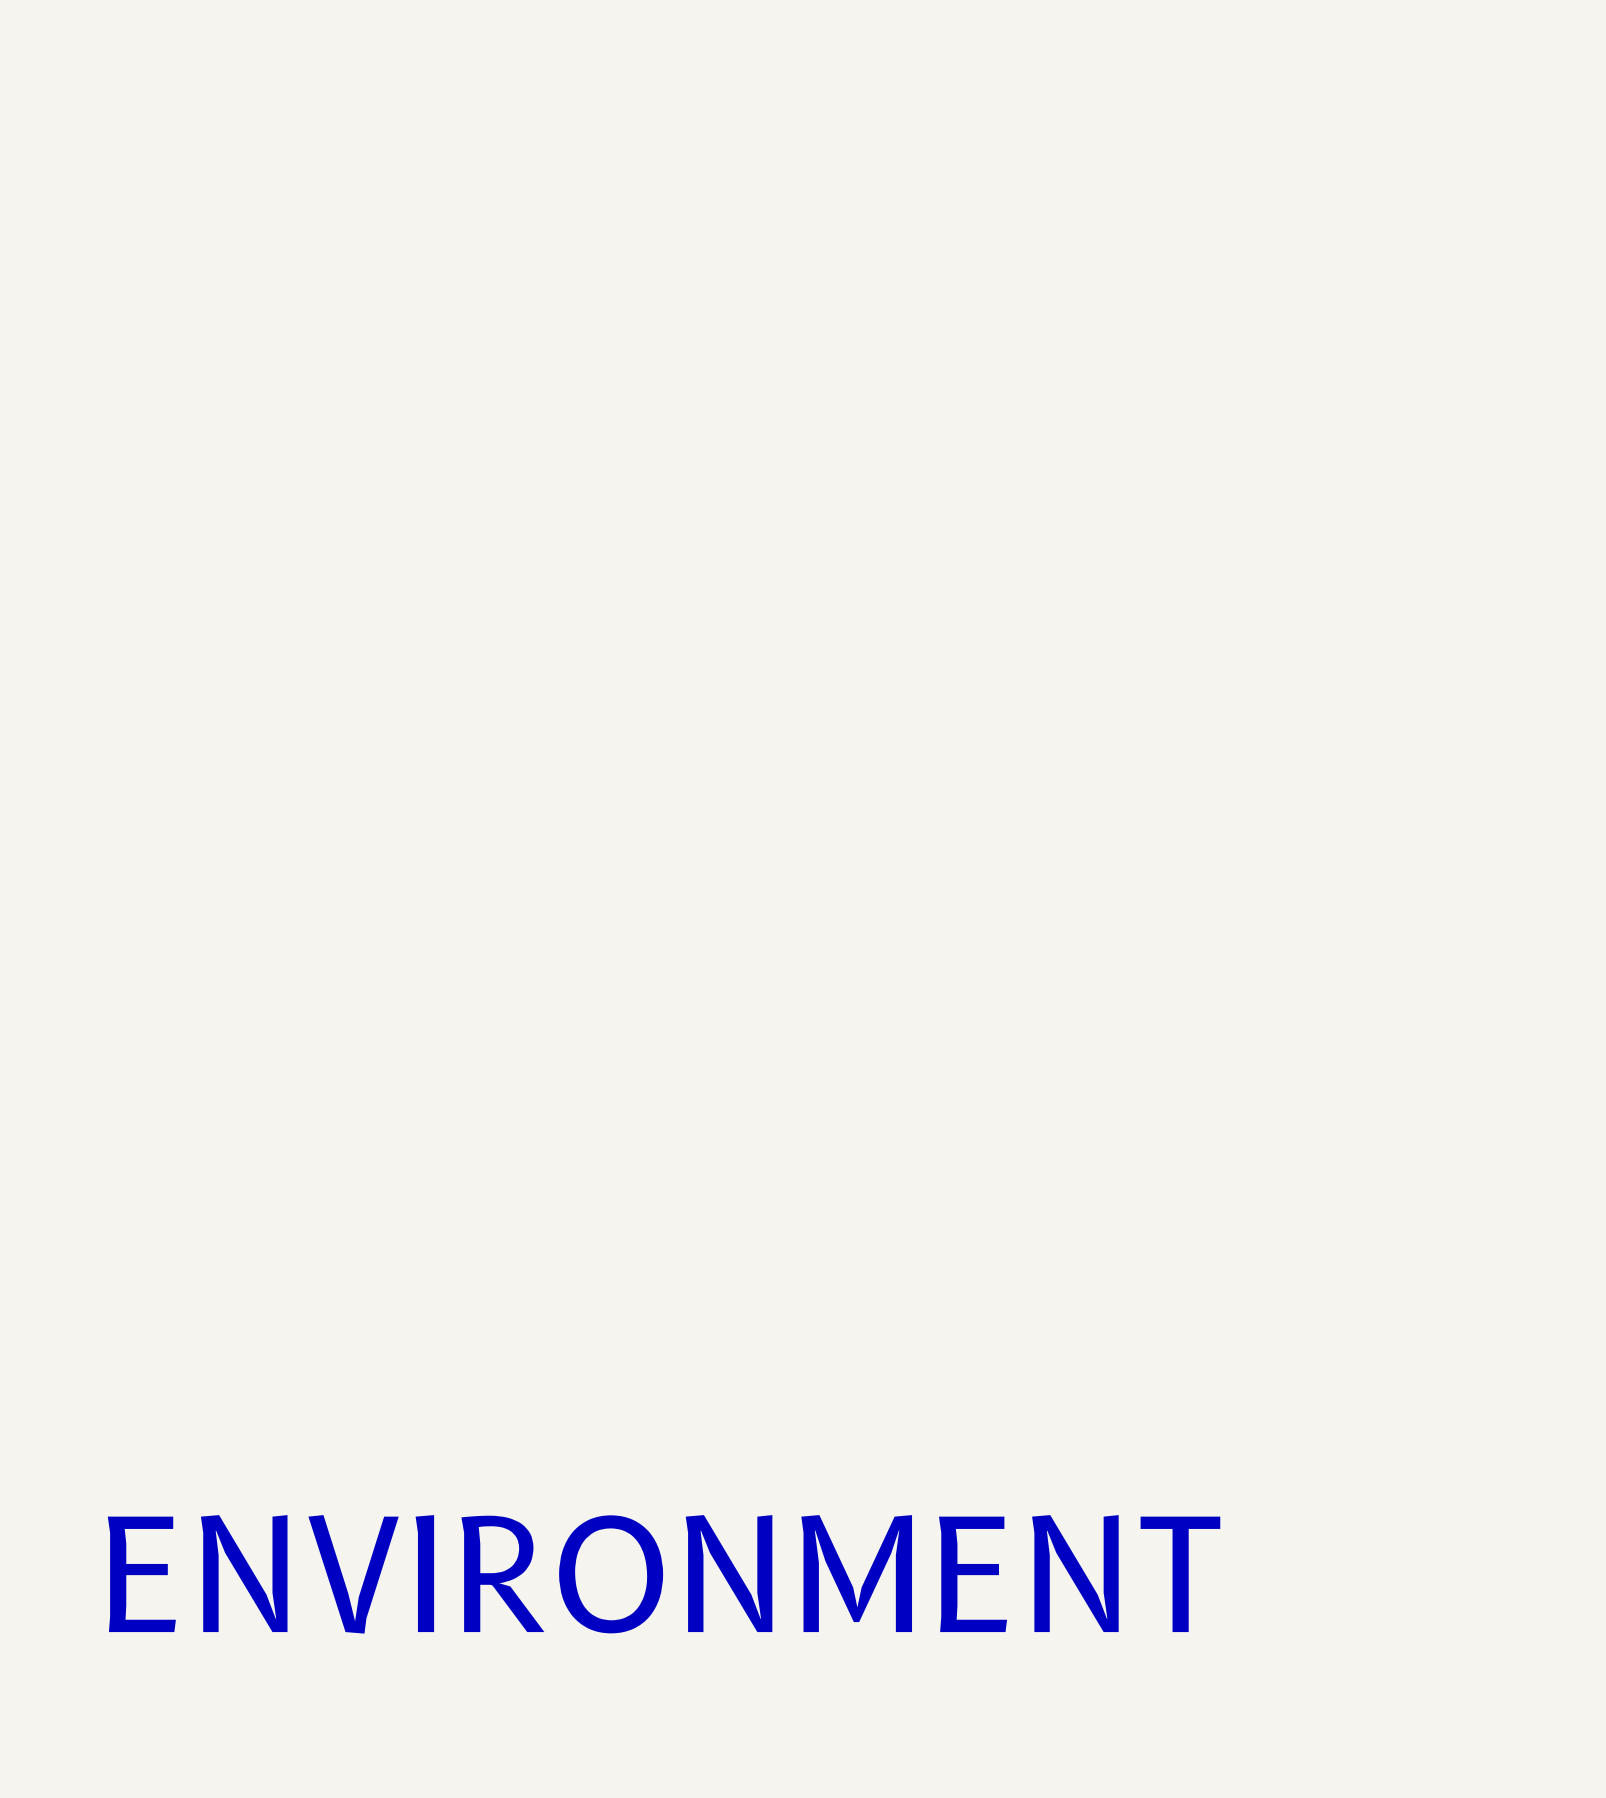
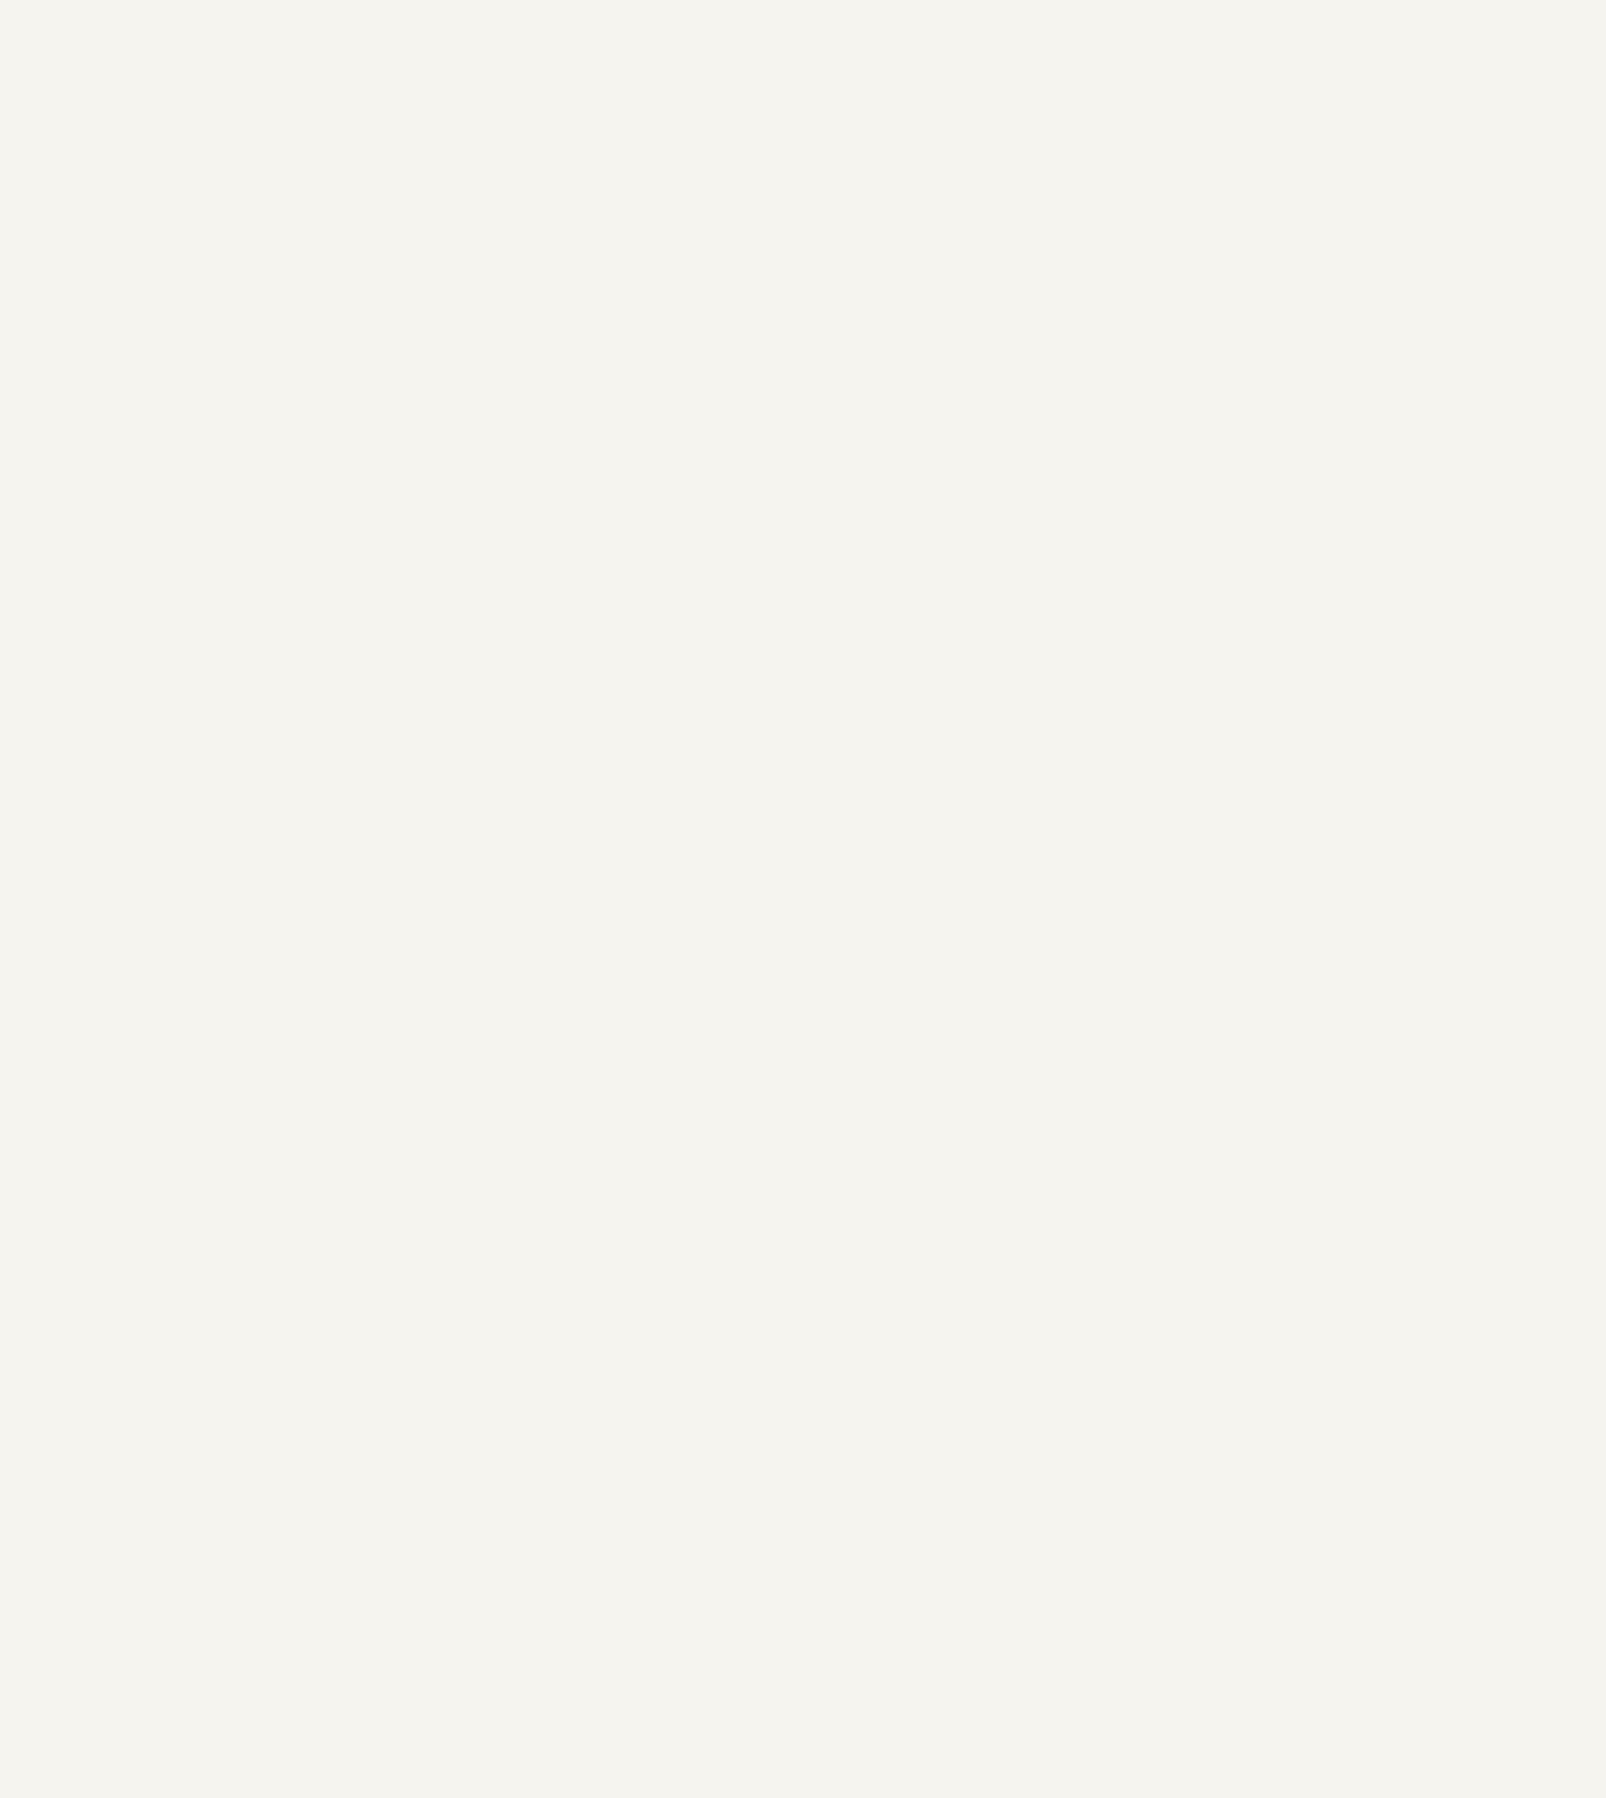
text: ENVIRONMENT (664, 1574) -> none

